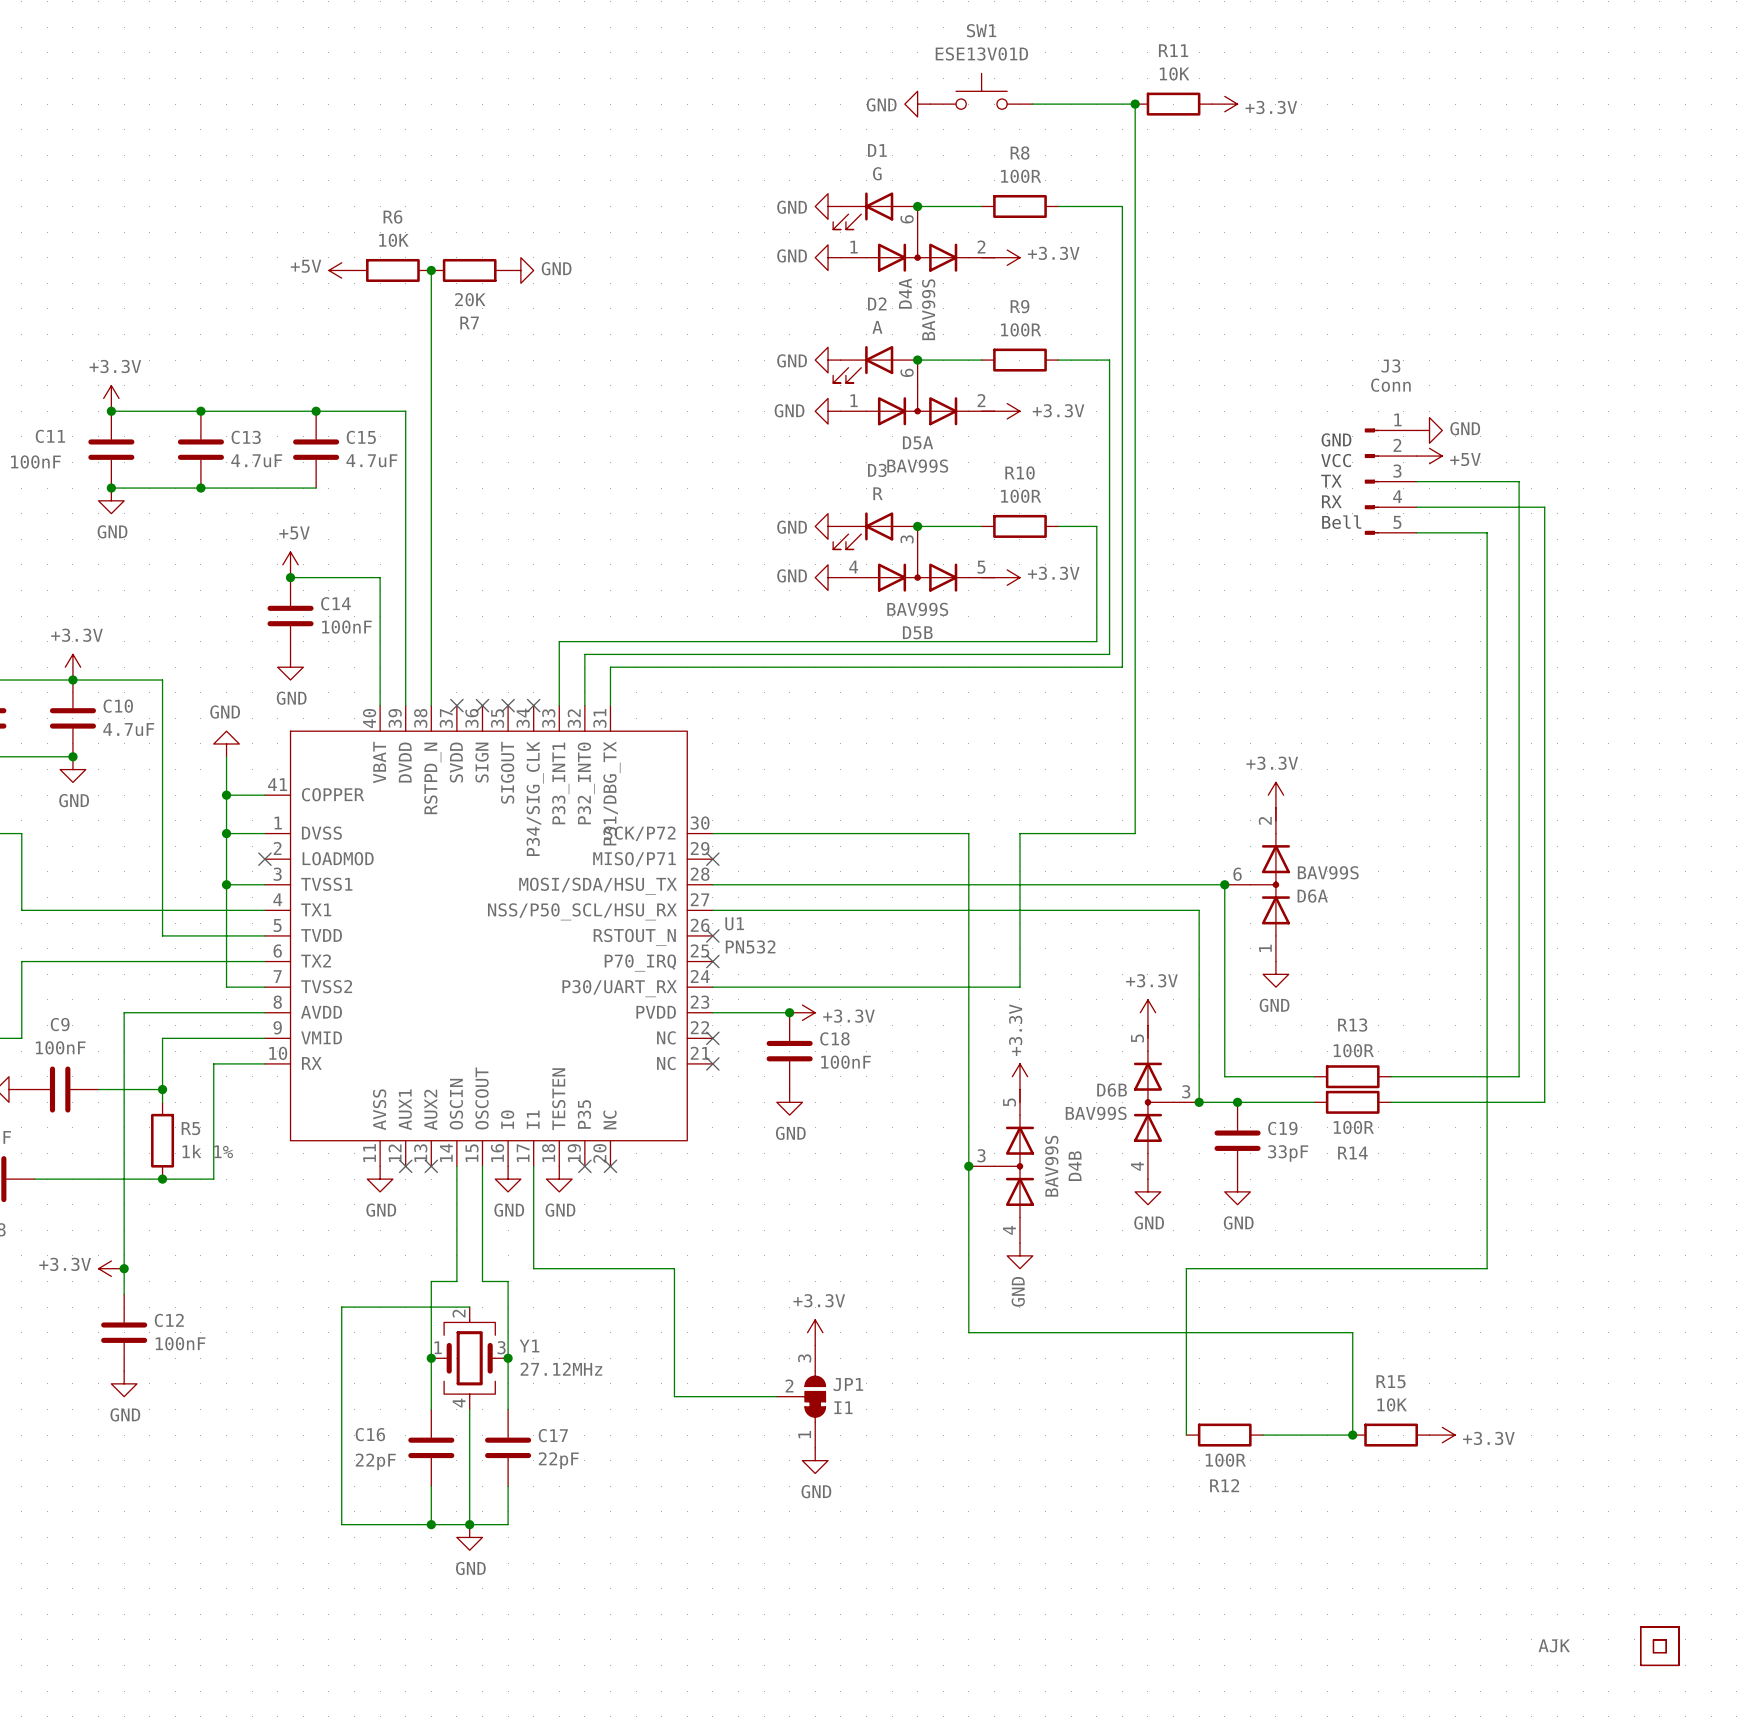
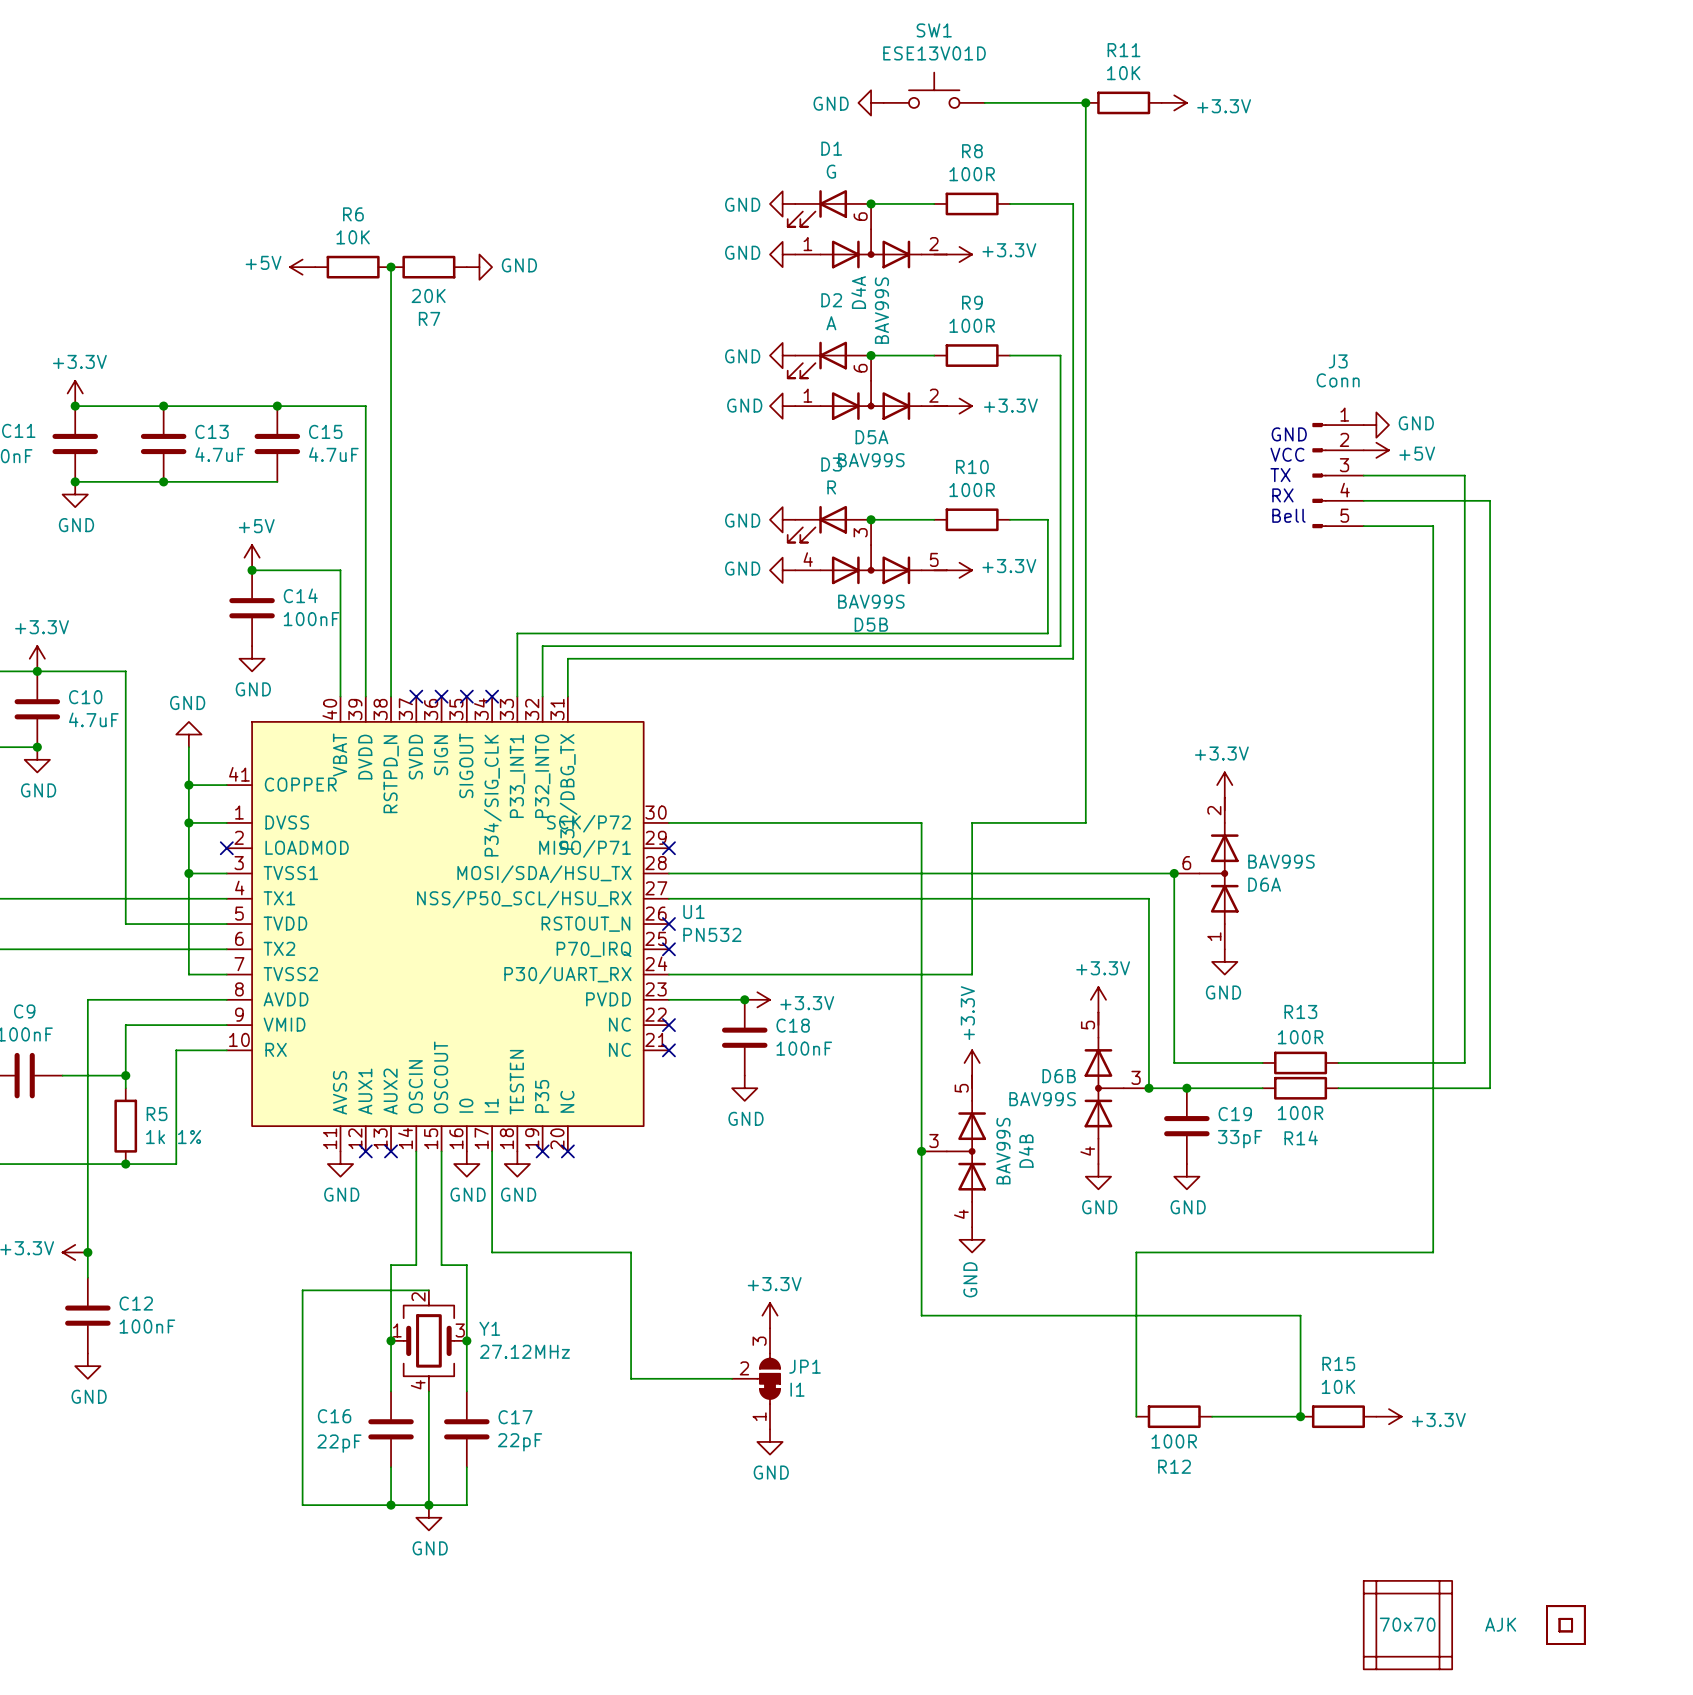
part: none -> (1407, 1593)
part: none -> (1376, 1625)
part: none -> 70x70 (1407, 1625)
part: none -> (1439, 1625)
part position: (1659, 1646) -> (1565, 1625)
part: none -> (1407, 1656)

